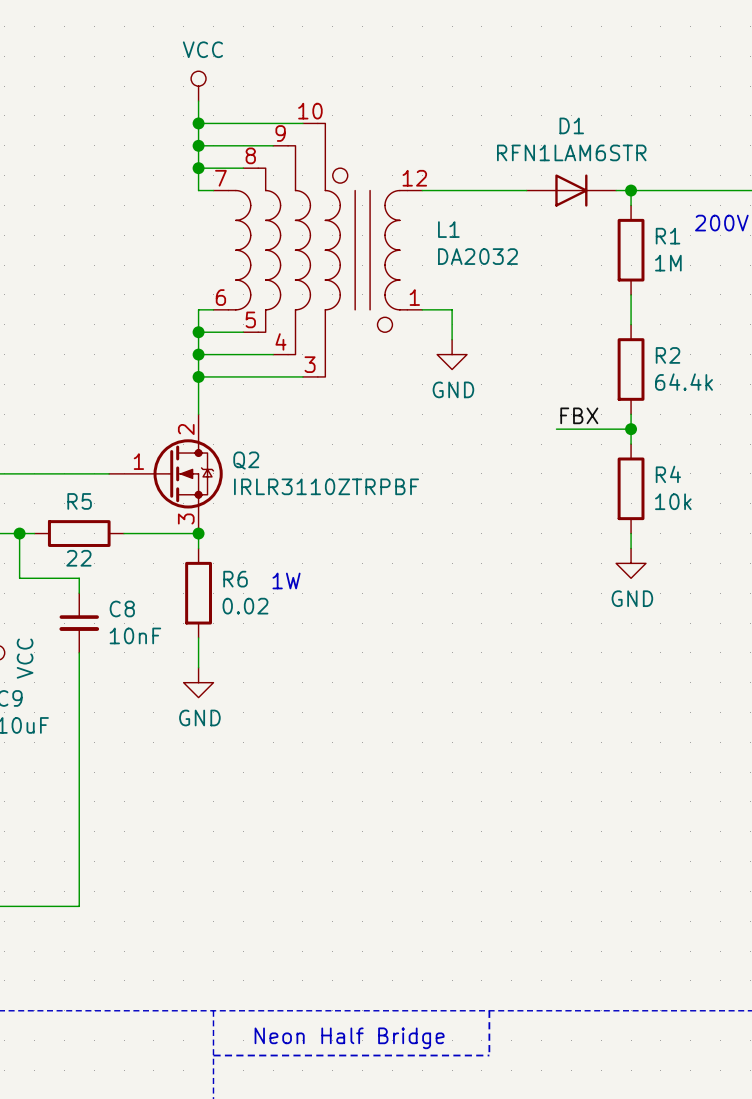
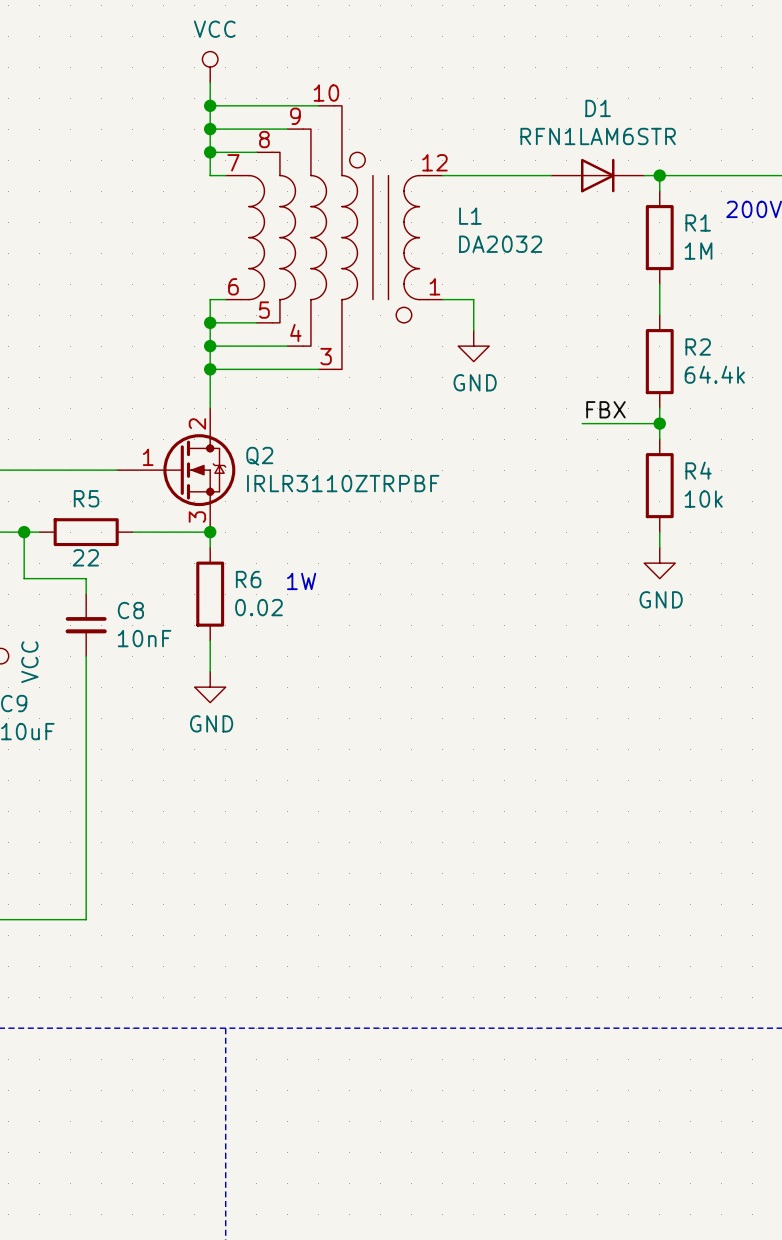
line: (489, 1010) (489, 1055) (213, 1055) -> none
text: Neon Half Bridge (349, 1038) -> none

